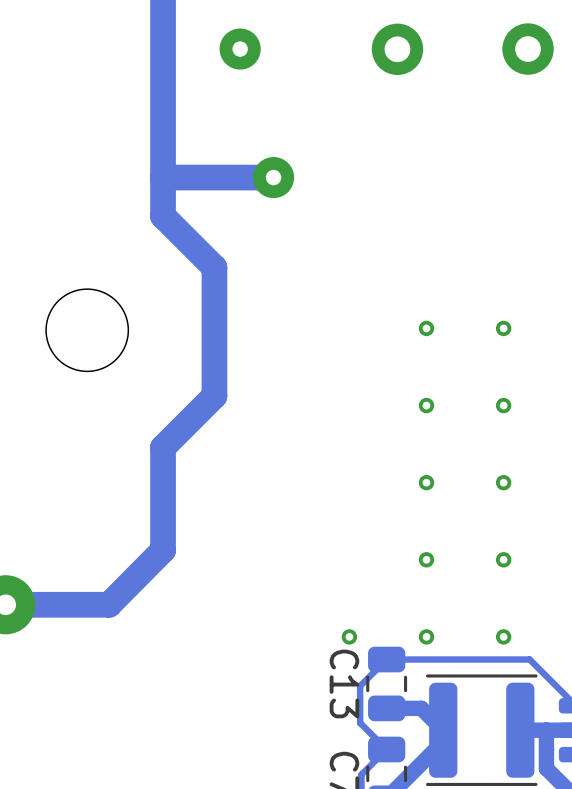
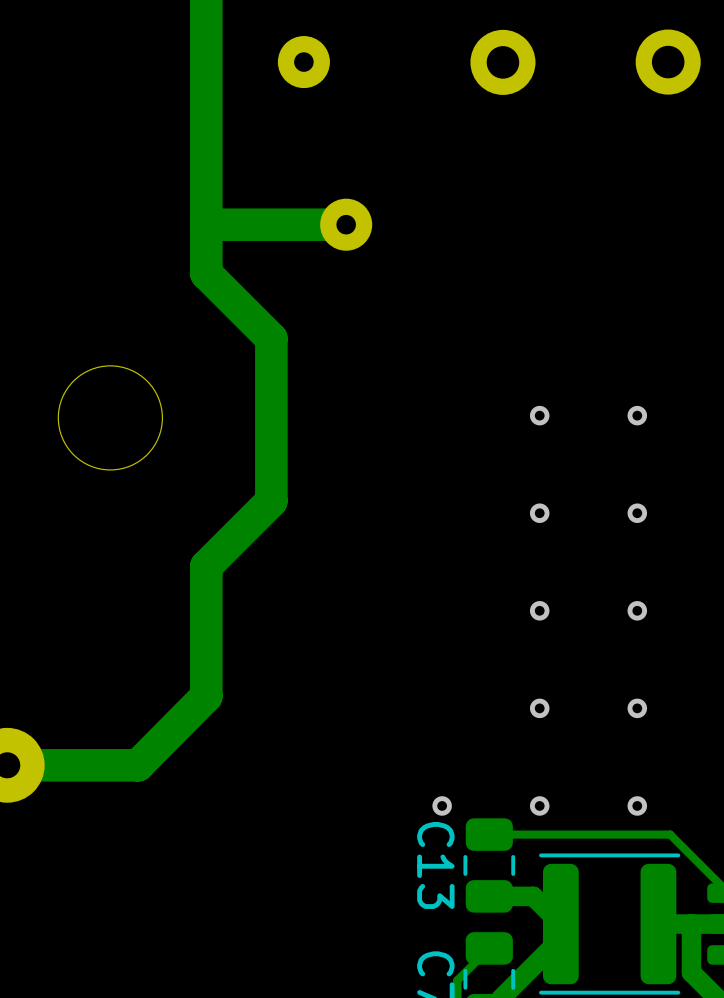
track: (386, 659) (360, 686) (360, 722) (386, 749) -> none

